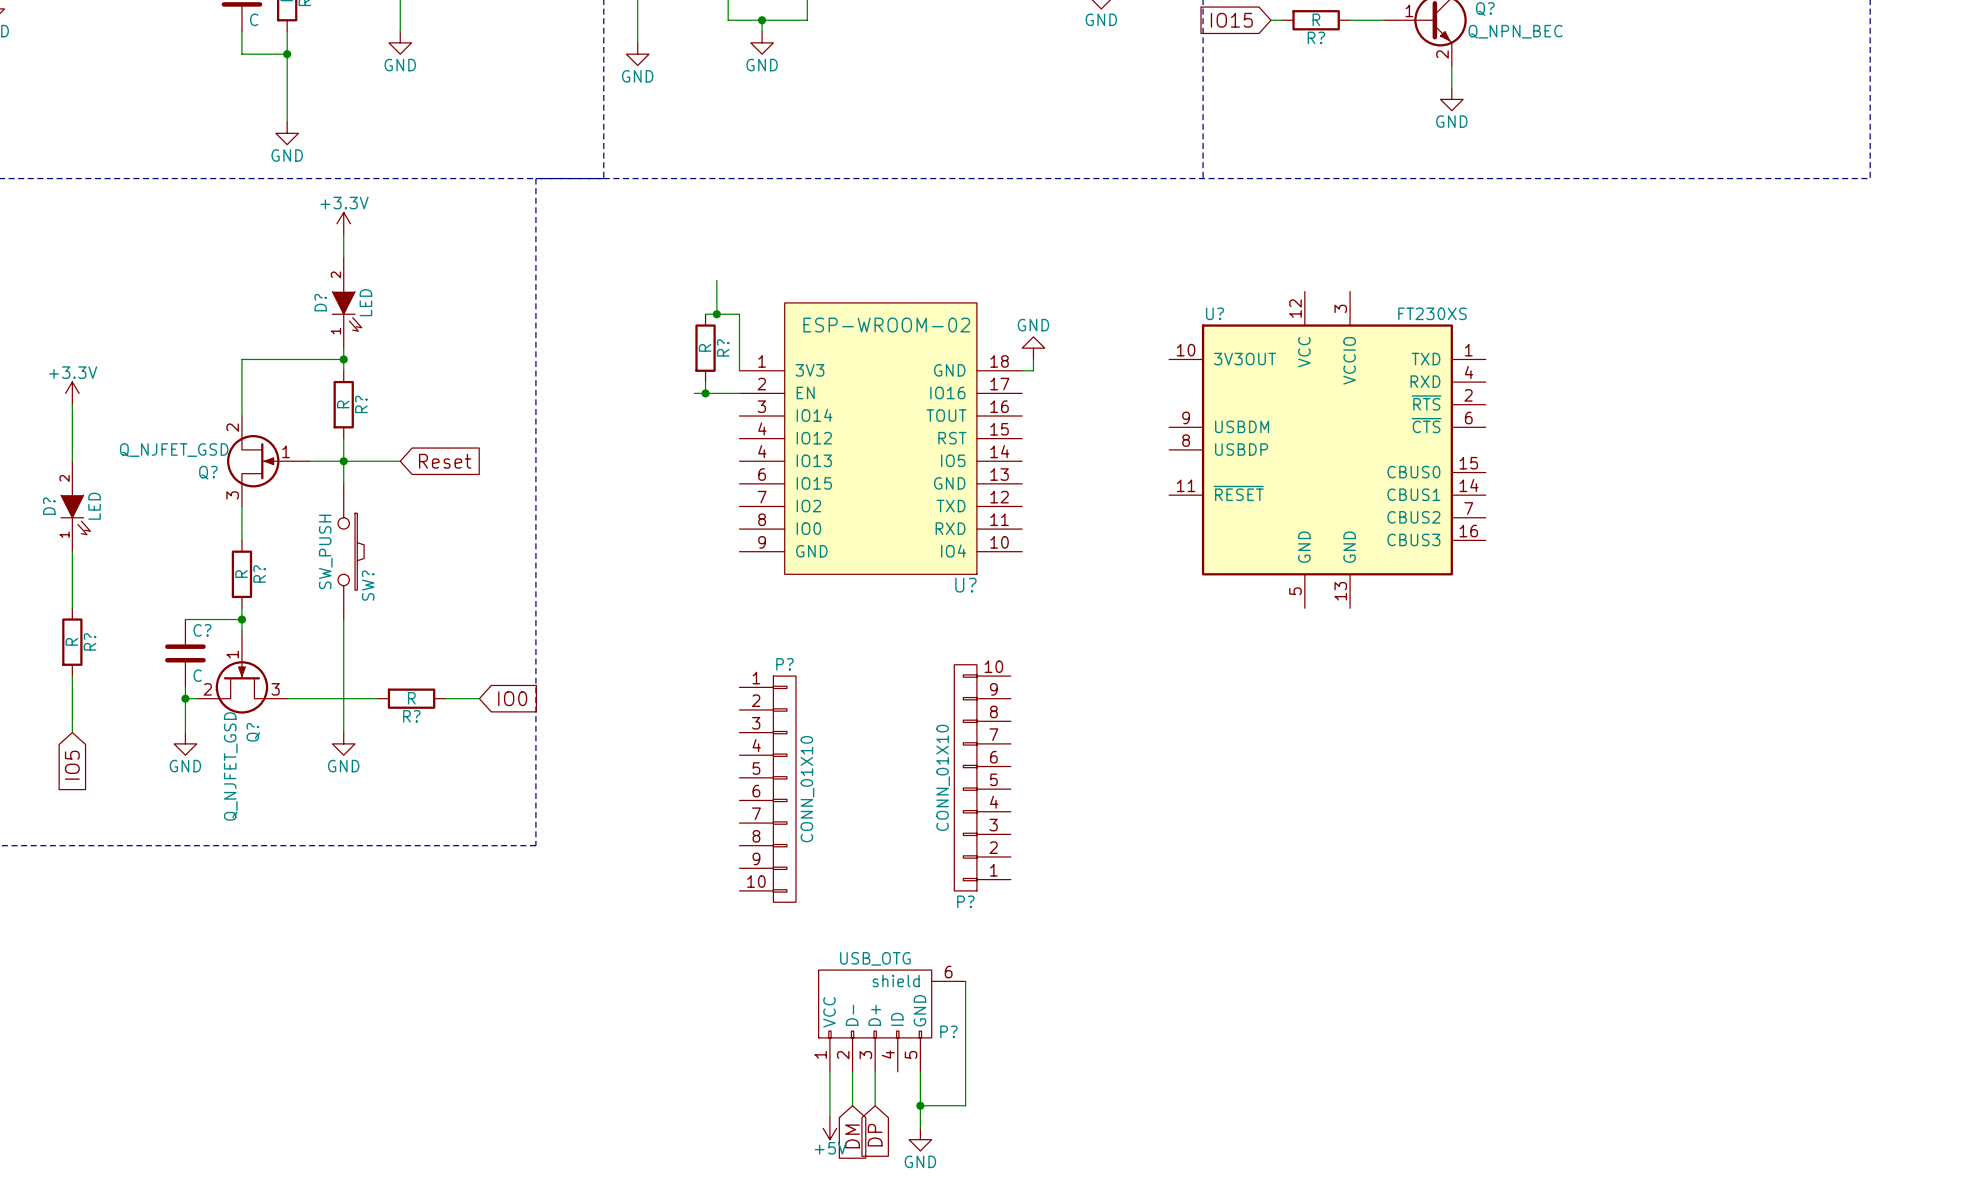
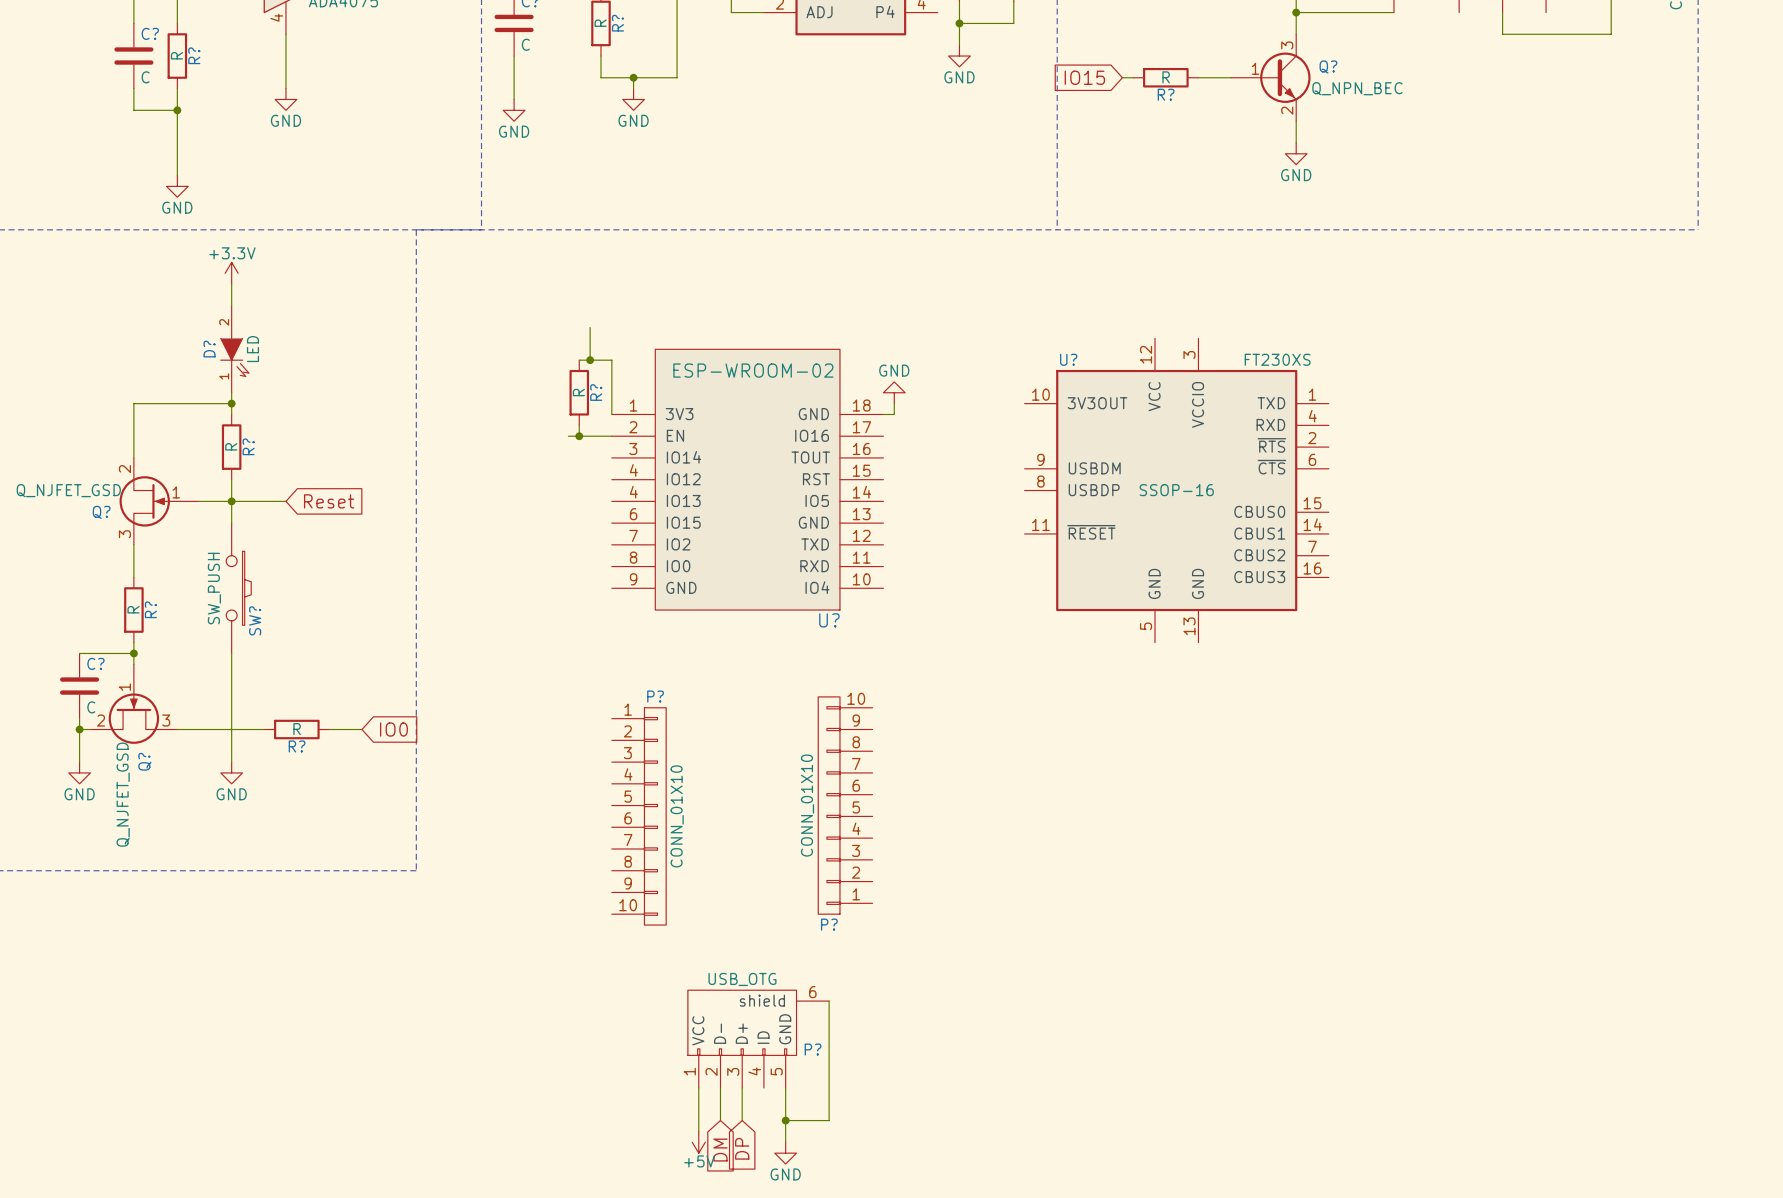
U? text: none -> SSOP-16 (1176, 490)

